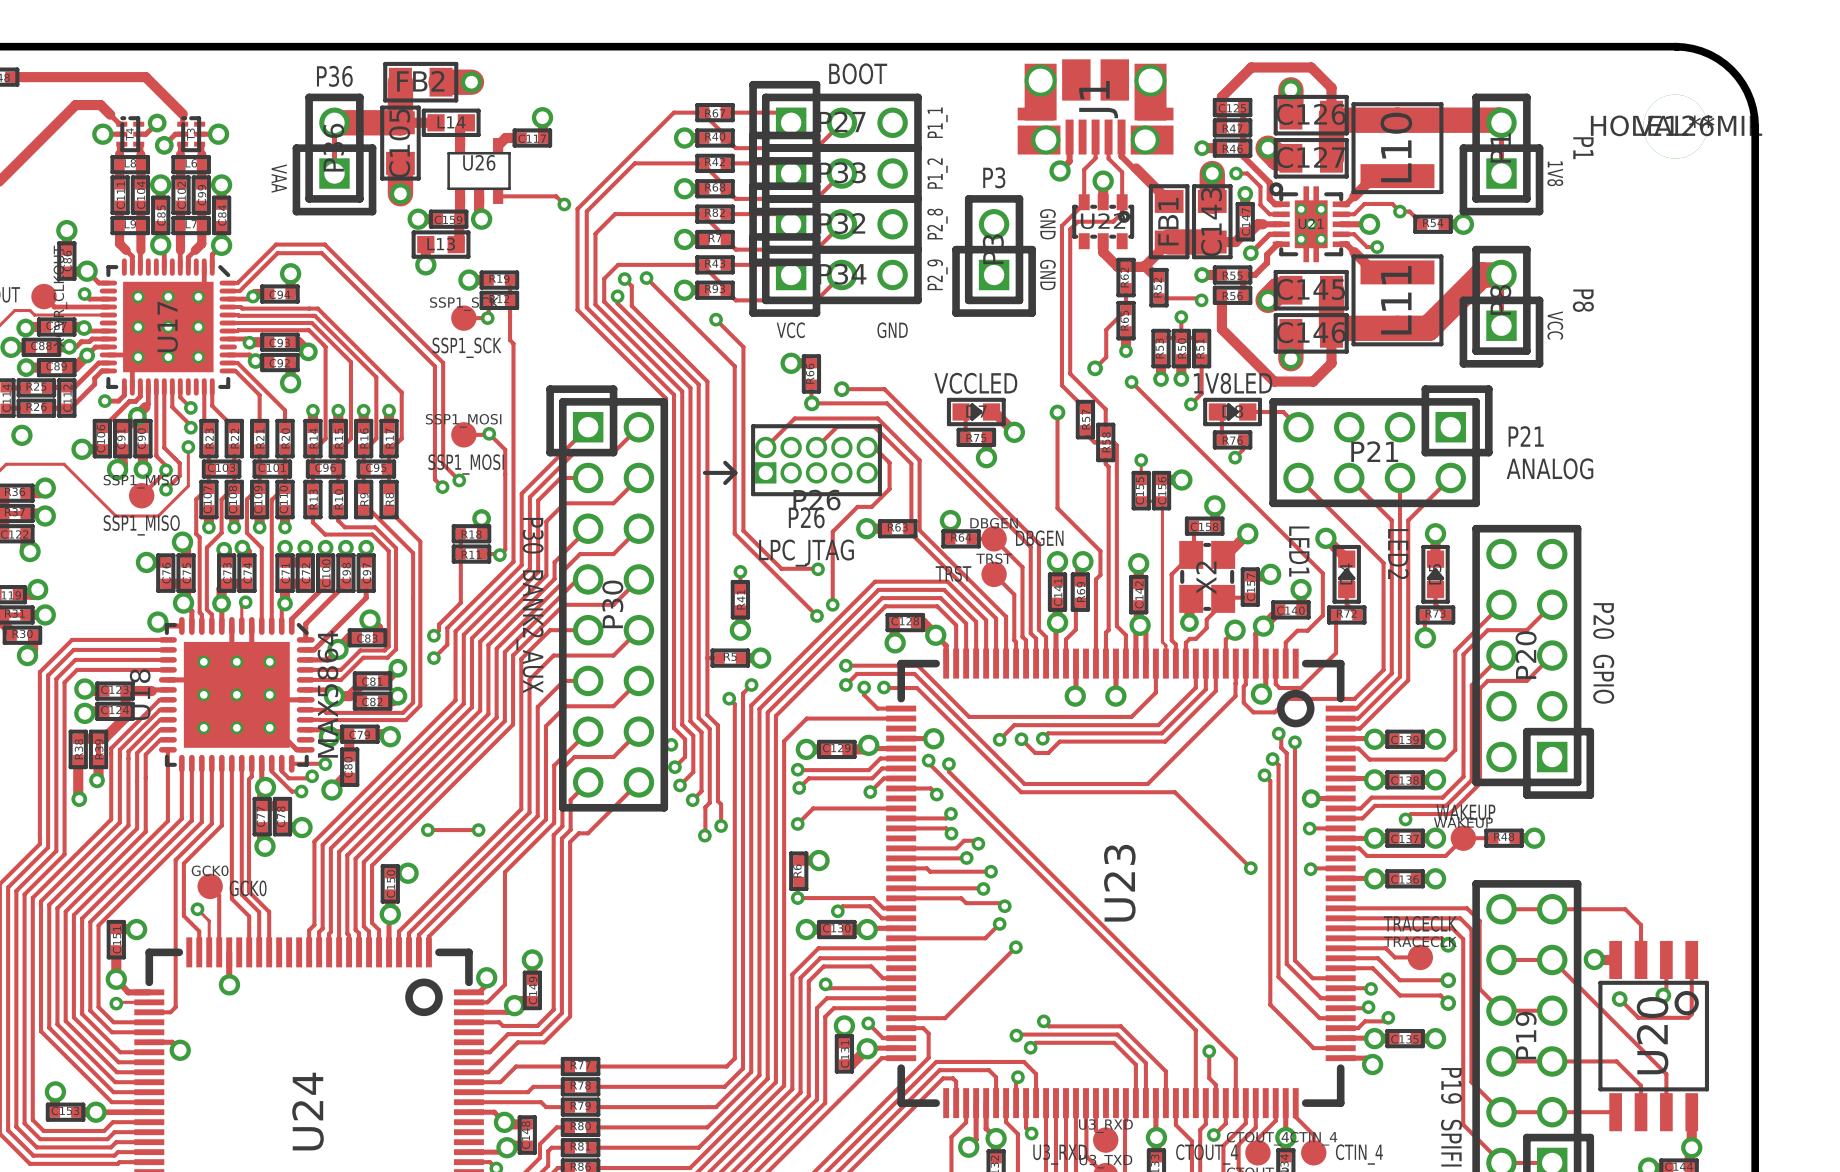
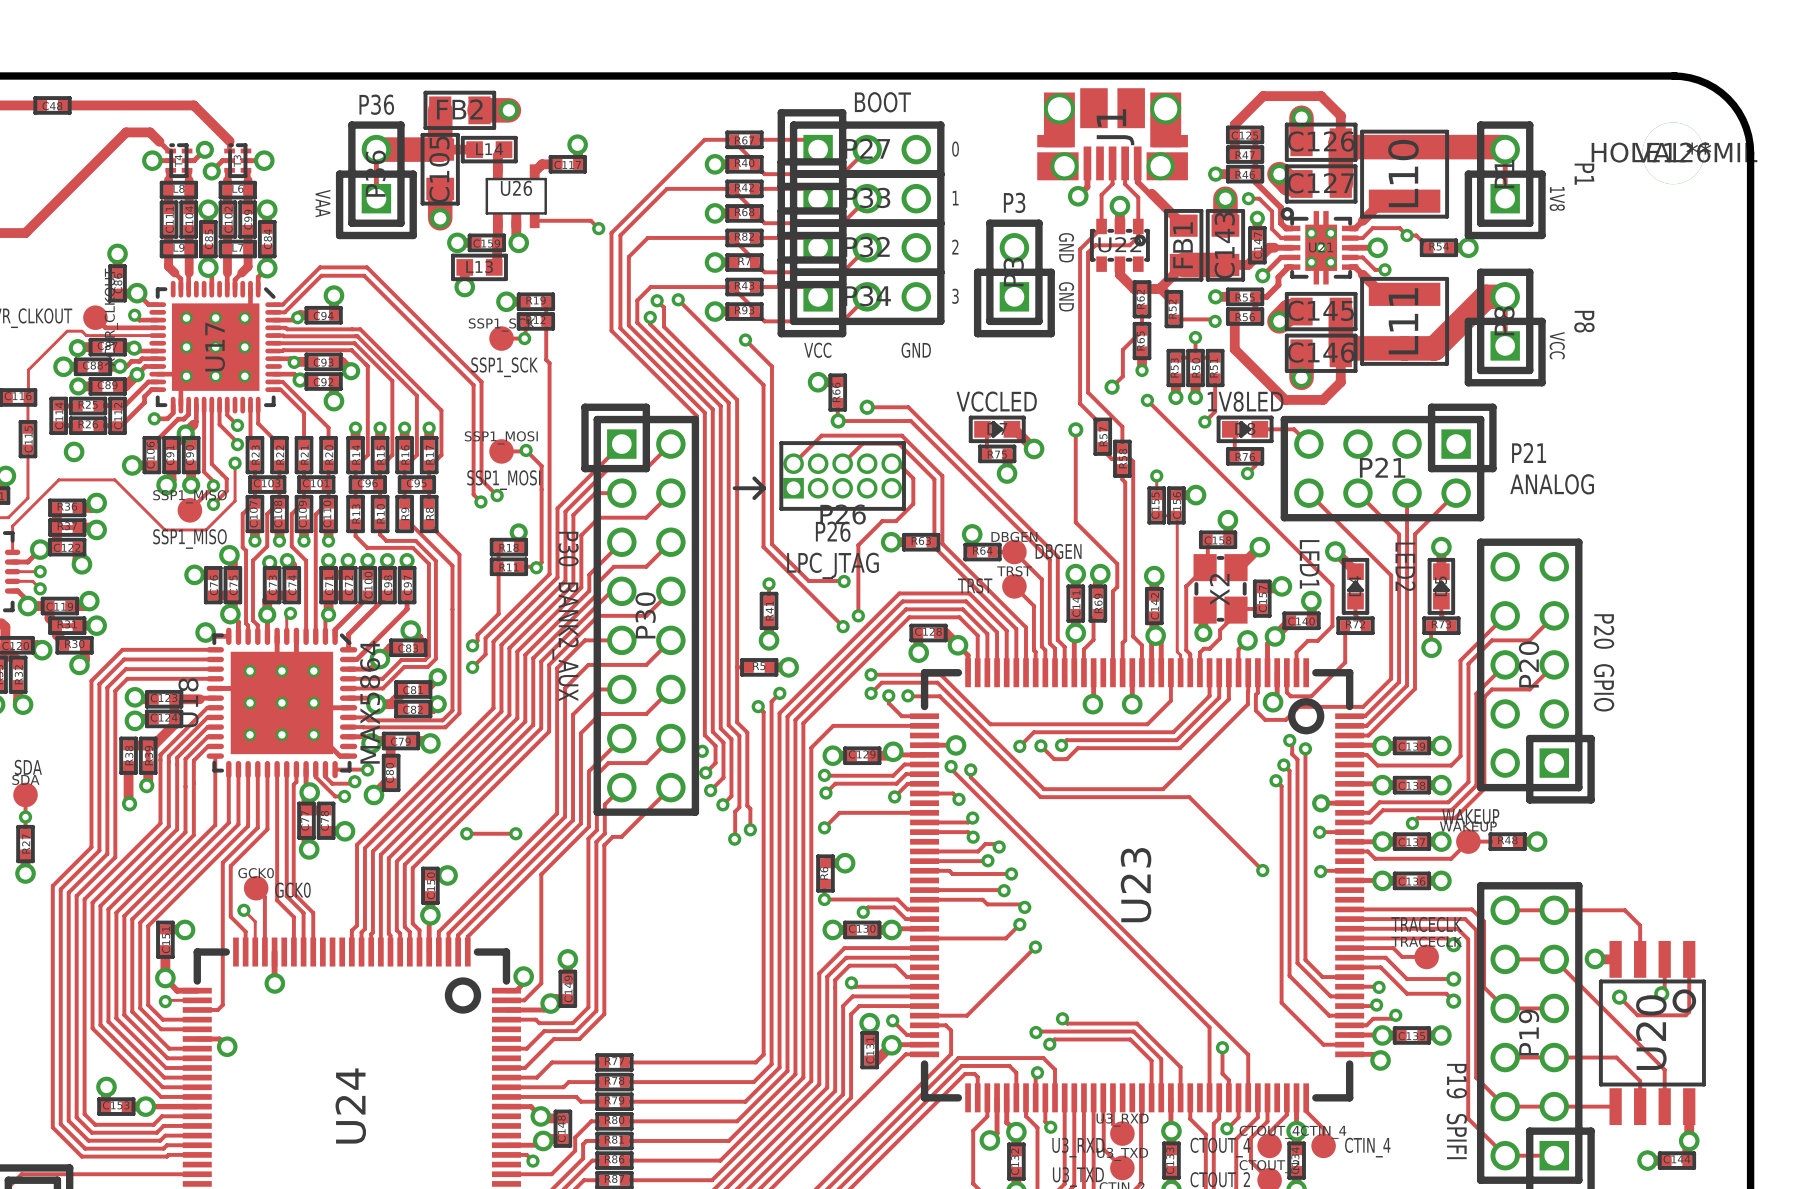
text: P1_1 (937, 122) -> 0 (955, 149)
text: P1_2 (937, 173) -> 1 (955, 198)
text: P2_8 (937, 224) -> 2 (955, 247)
text: P2_9 (937, 274) -> 3 (955, 296)

